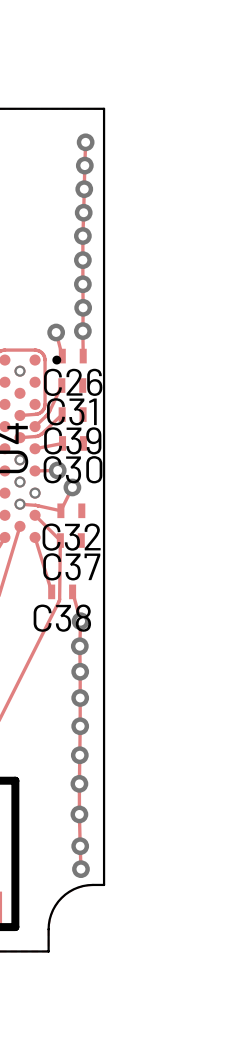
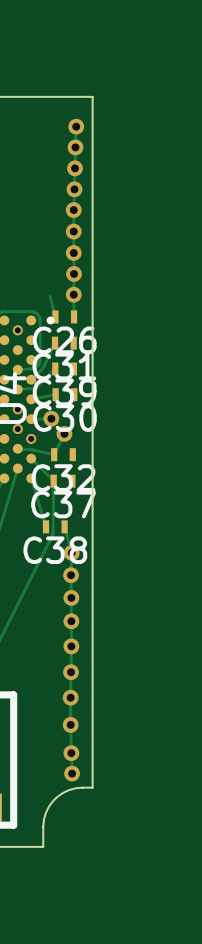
via: (56, 332) -> none
via: (19, 504) -> none

